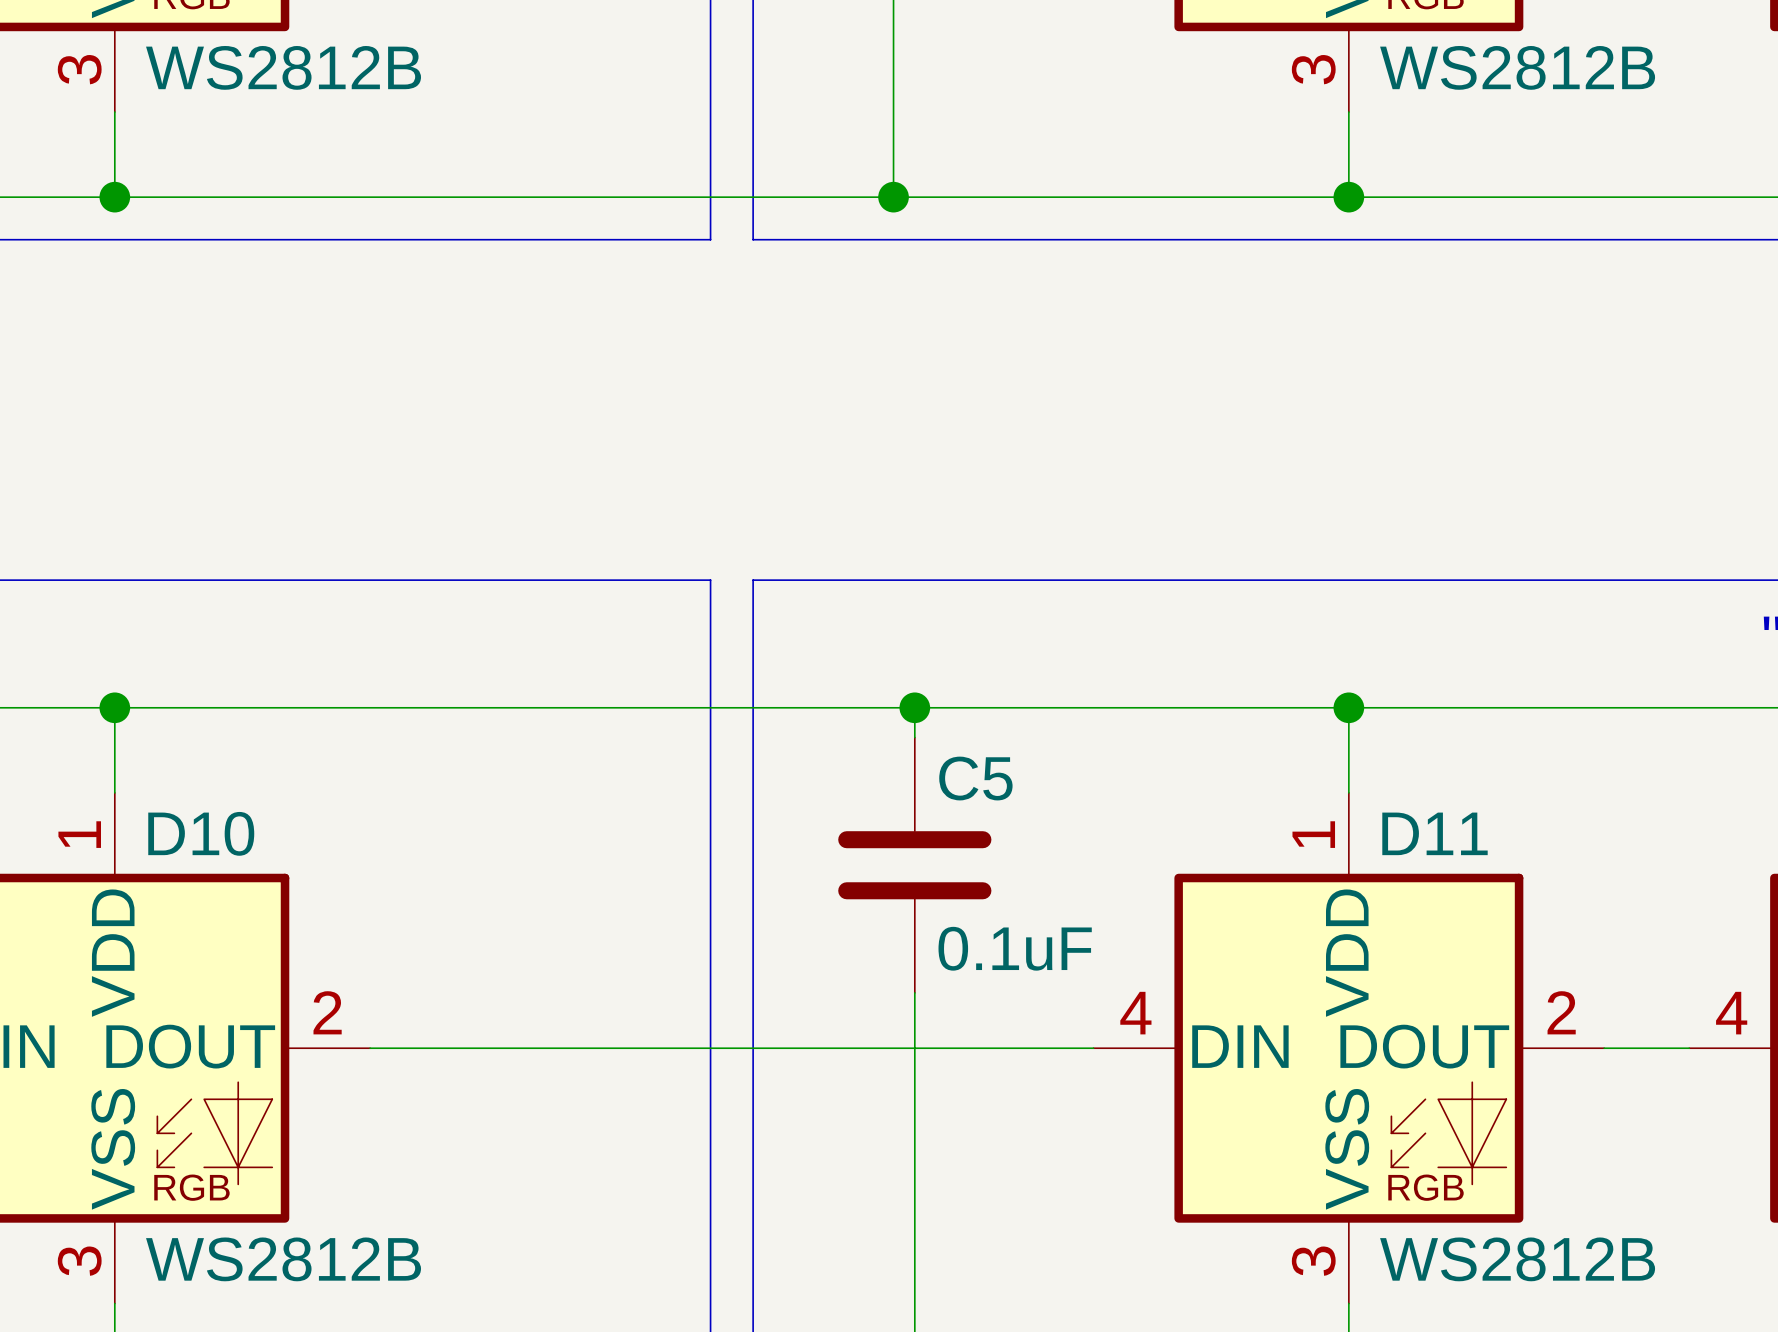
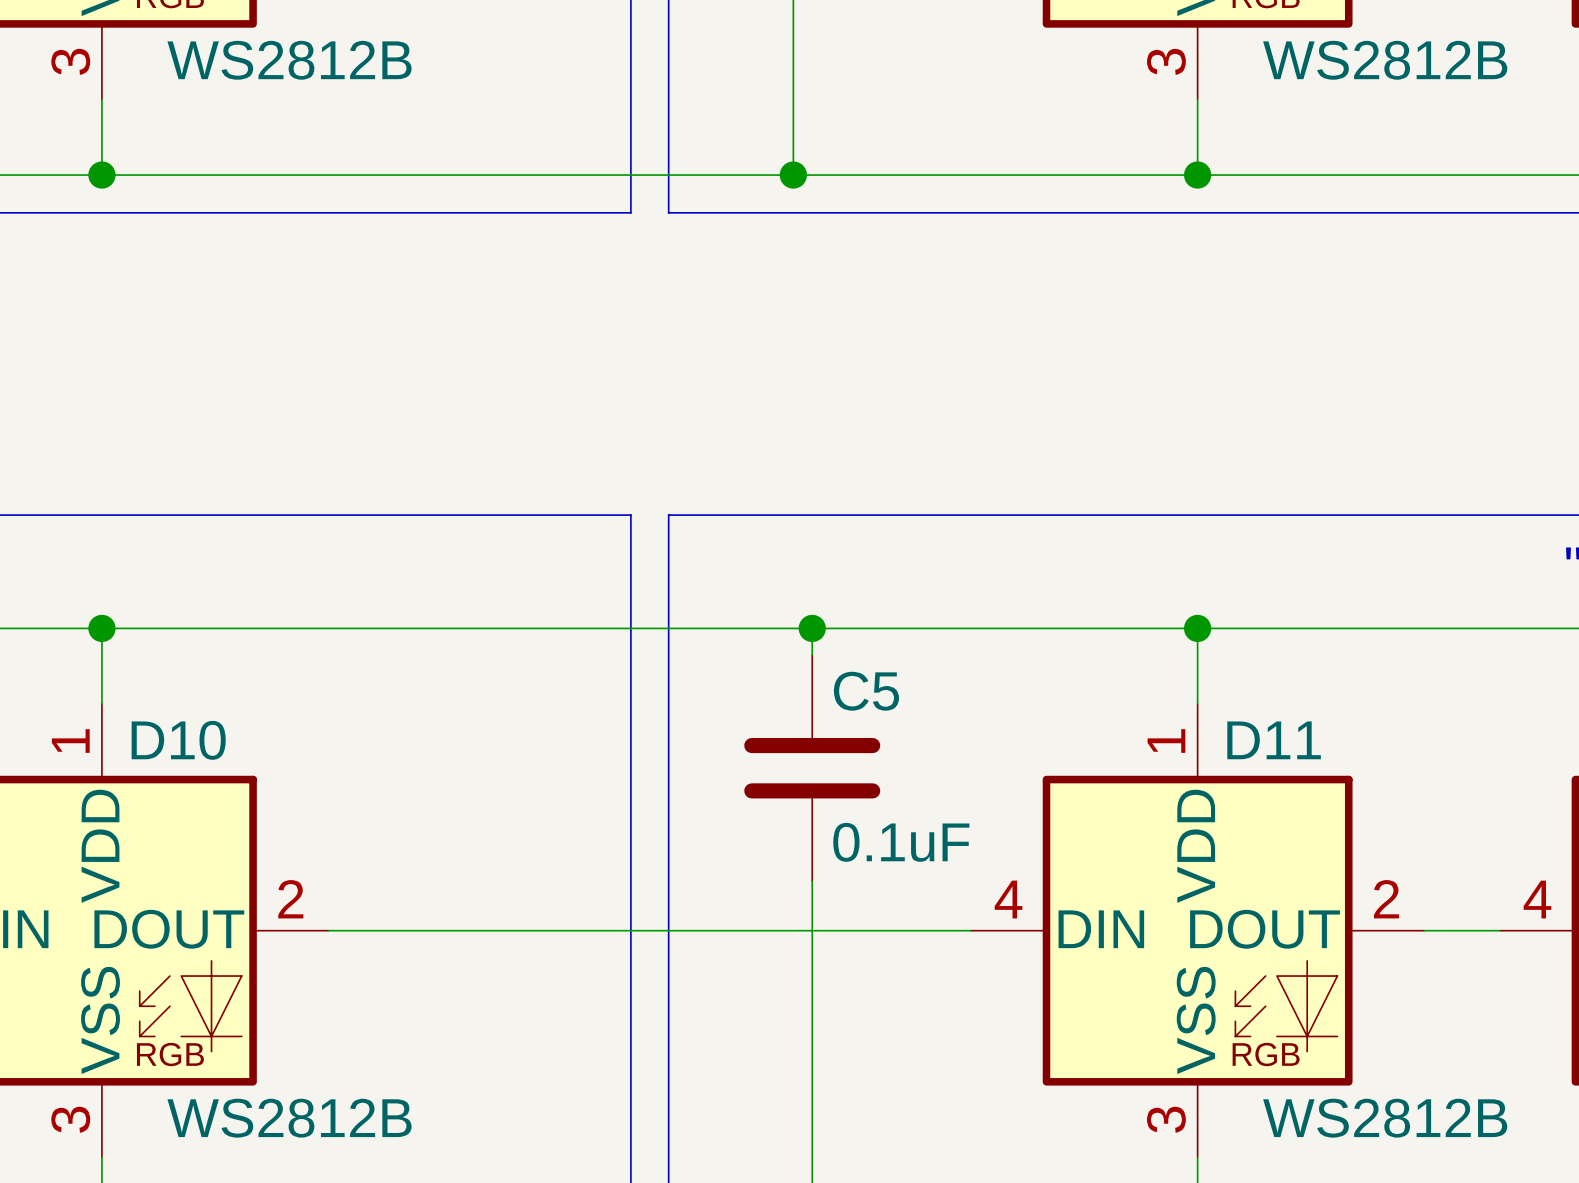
part text position: WS2812B (283, 67) -> WS2812B (289, 60)
part text position: WS2812B (1517, 67) -> WS2812B (1385, 60)
D10 text position: WS2812B (283, 1259) -> WS2812B (289, 1118)
D11 text position: WS2812B (1517, 1259) -> WS2812B (1385, 1118)

